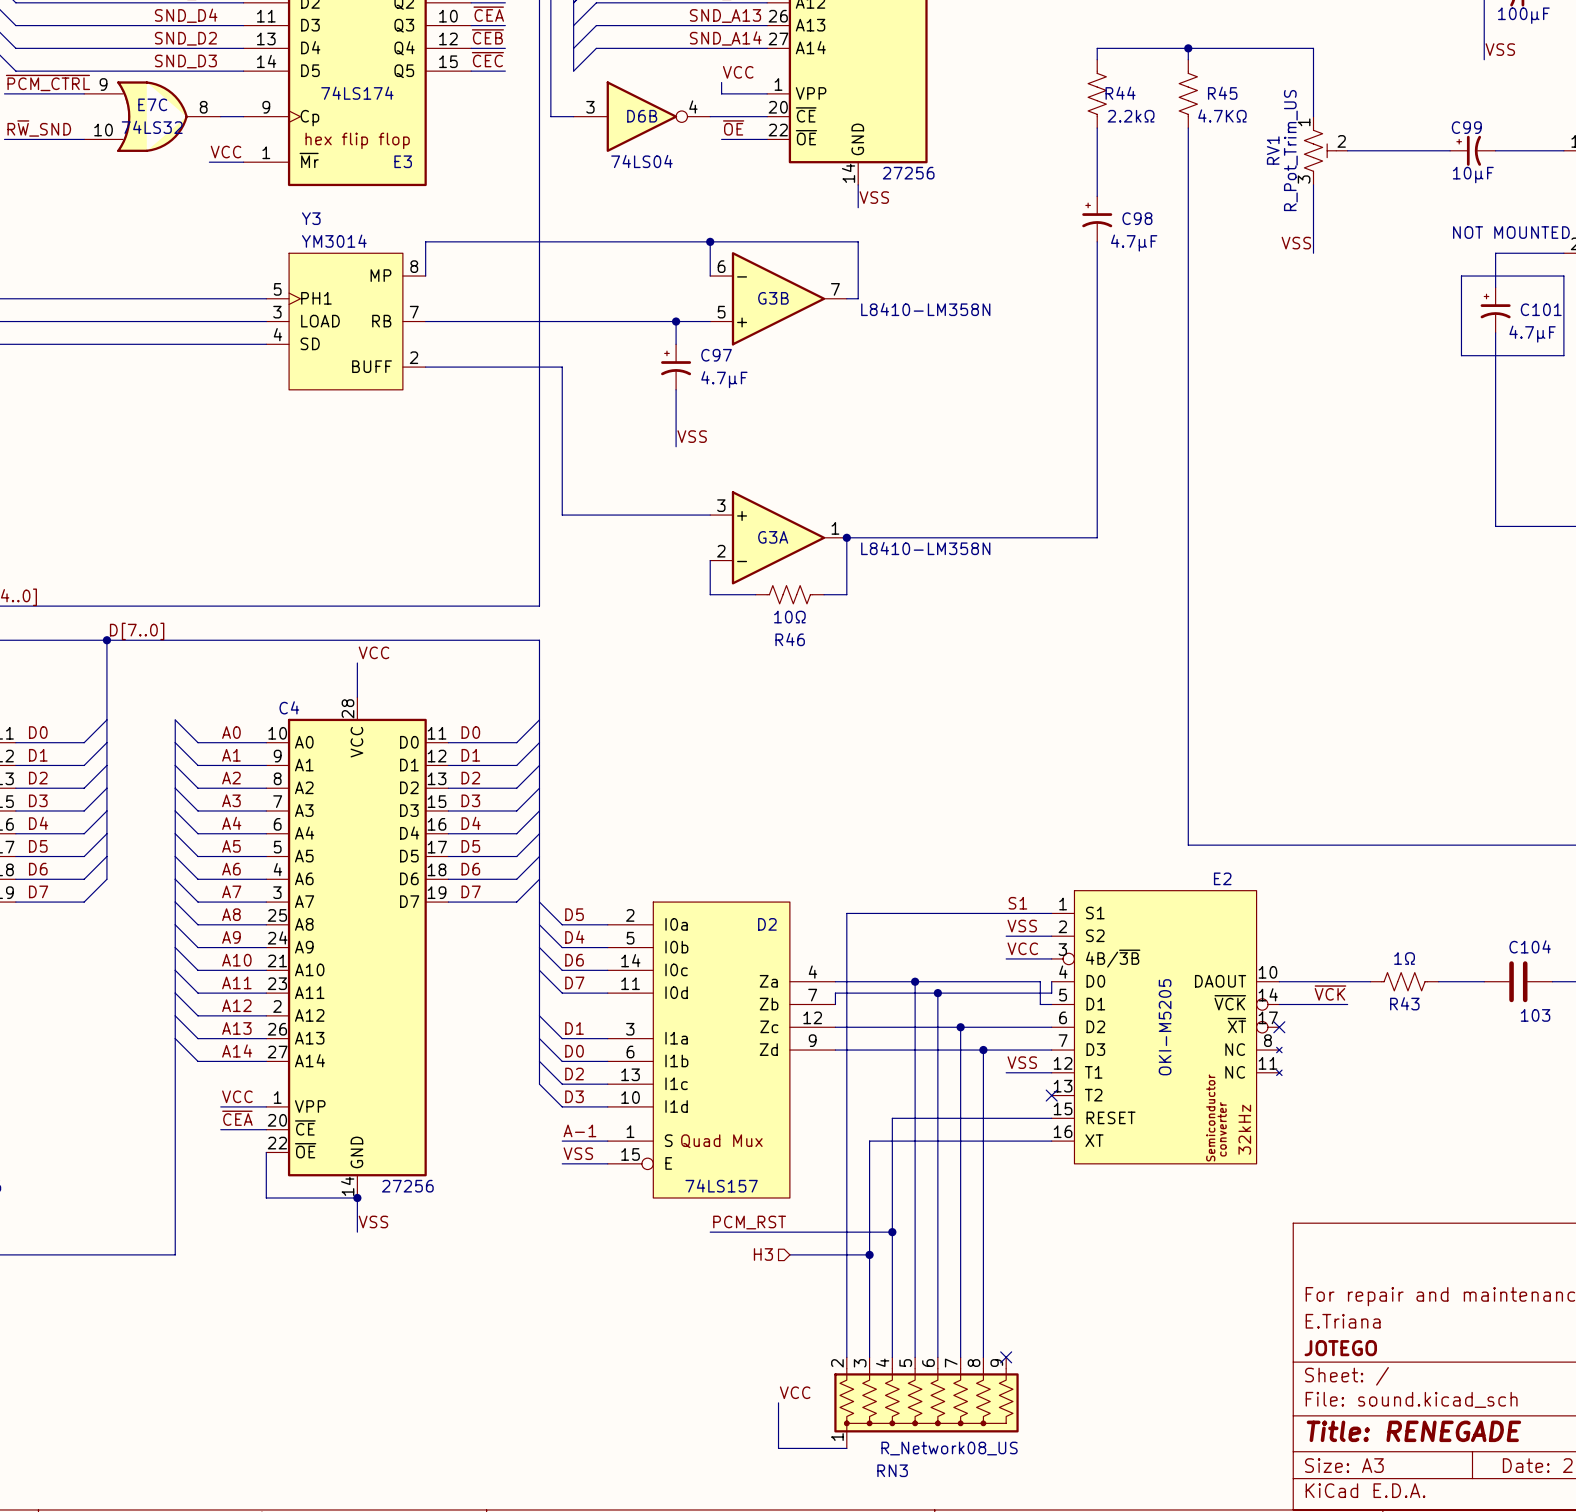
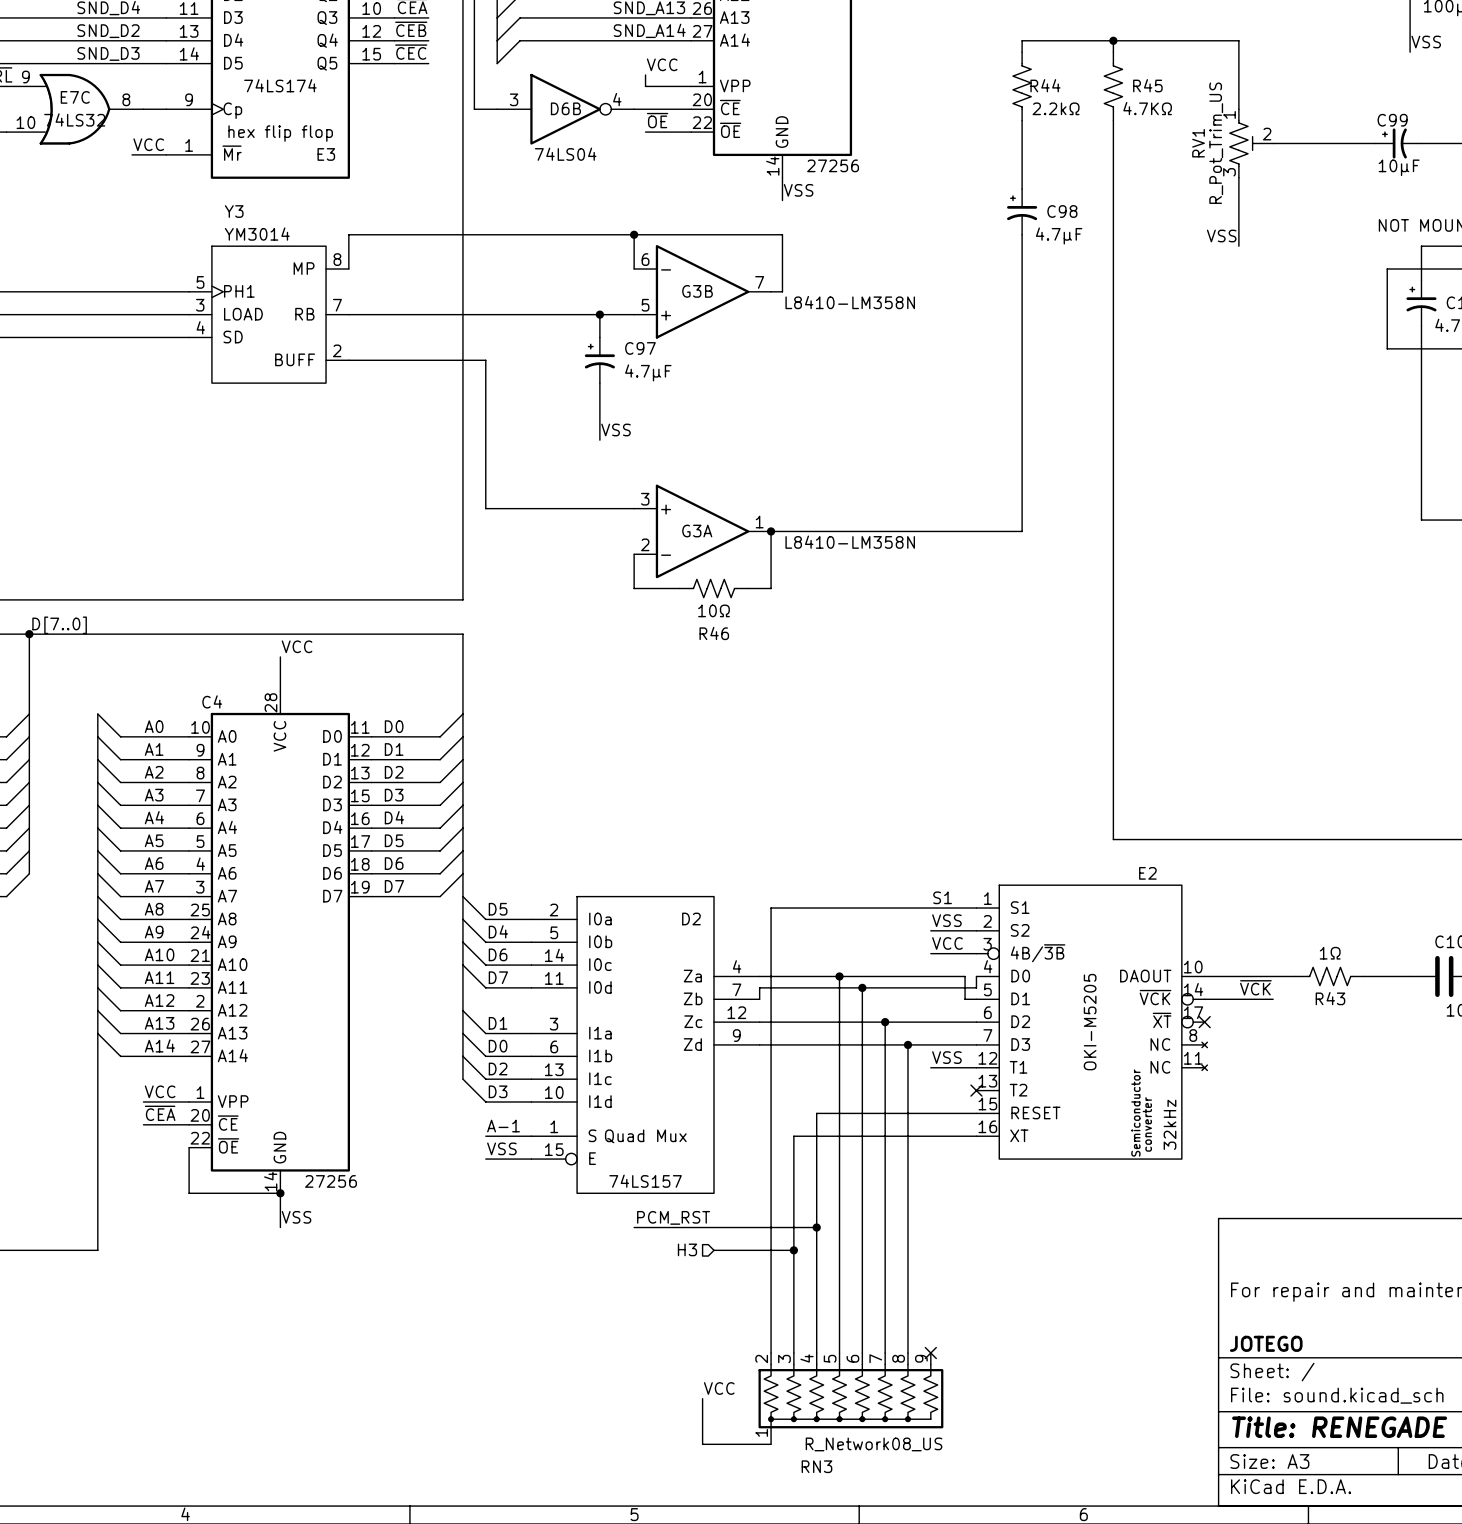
title block: E.Triana (1343, 1321) -> none

